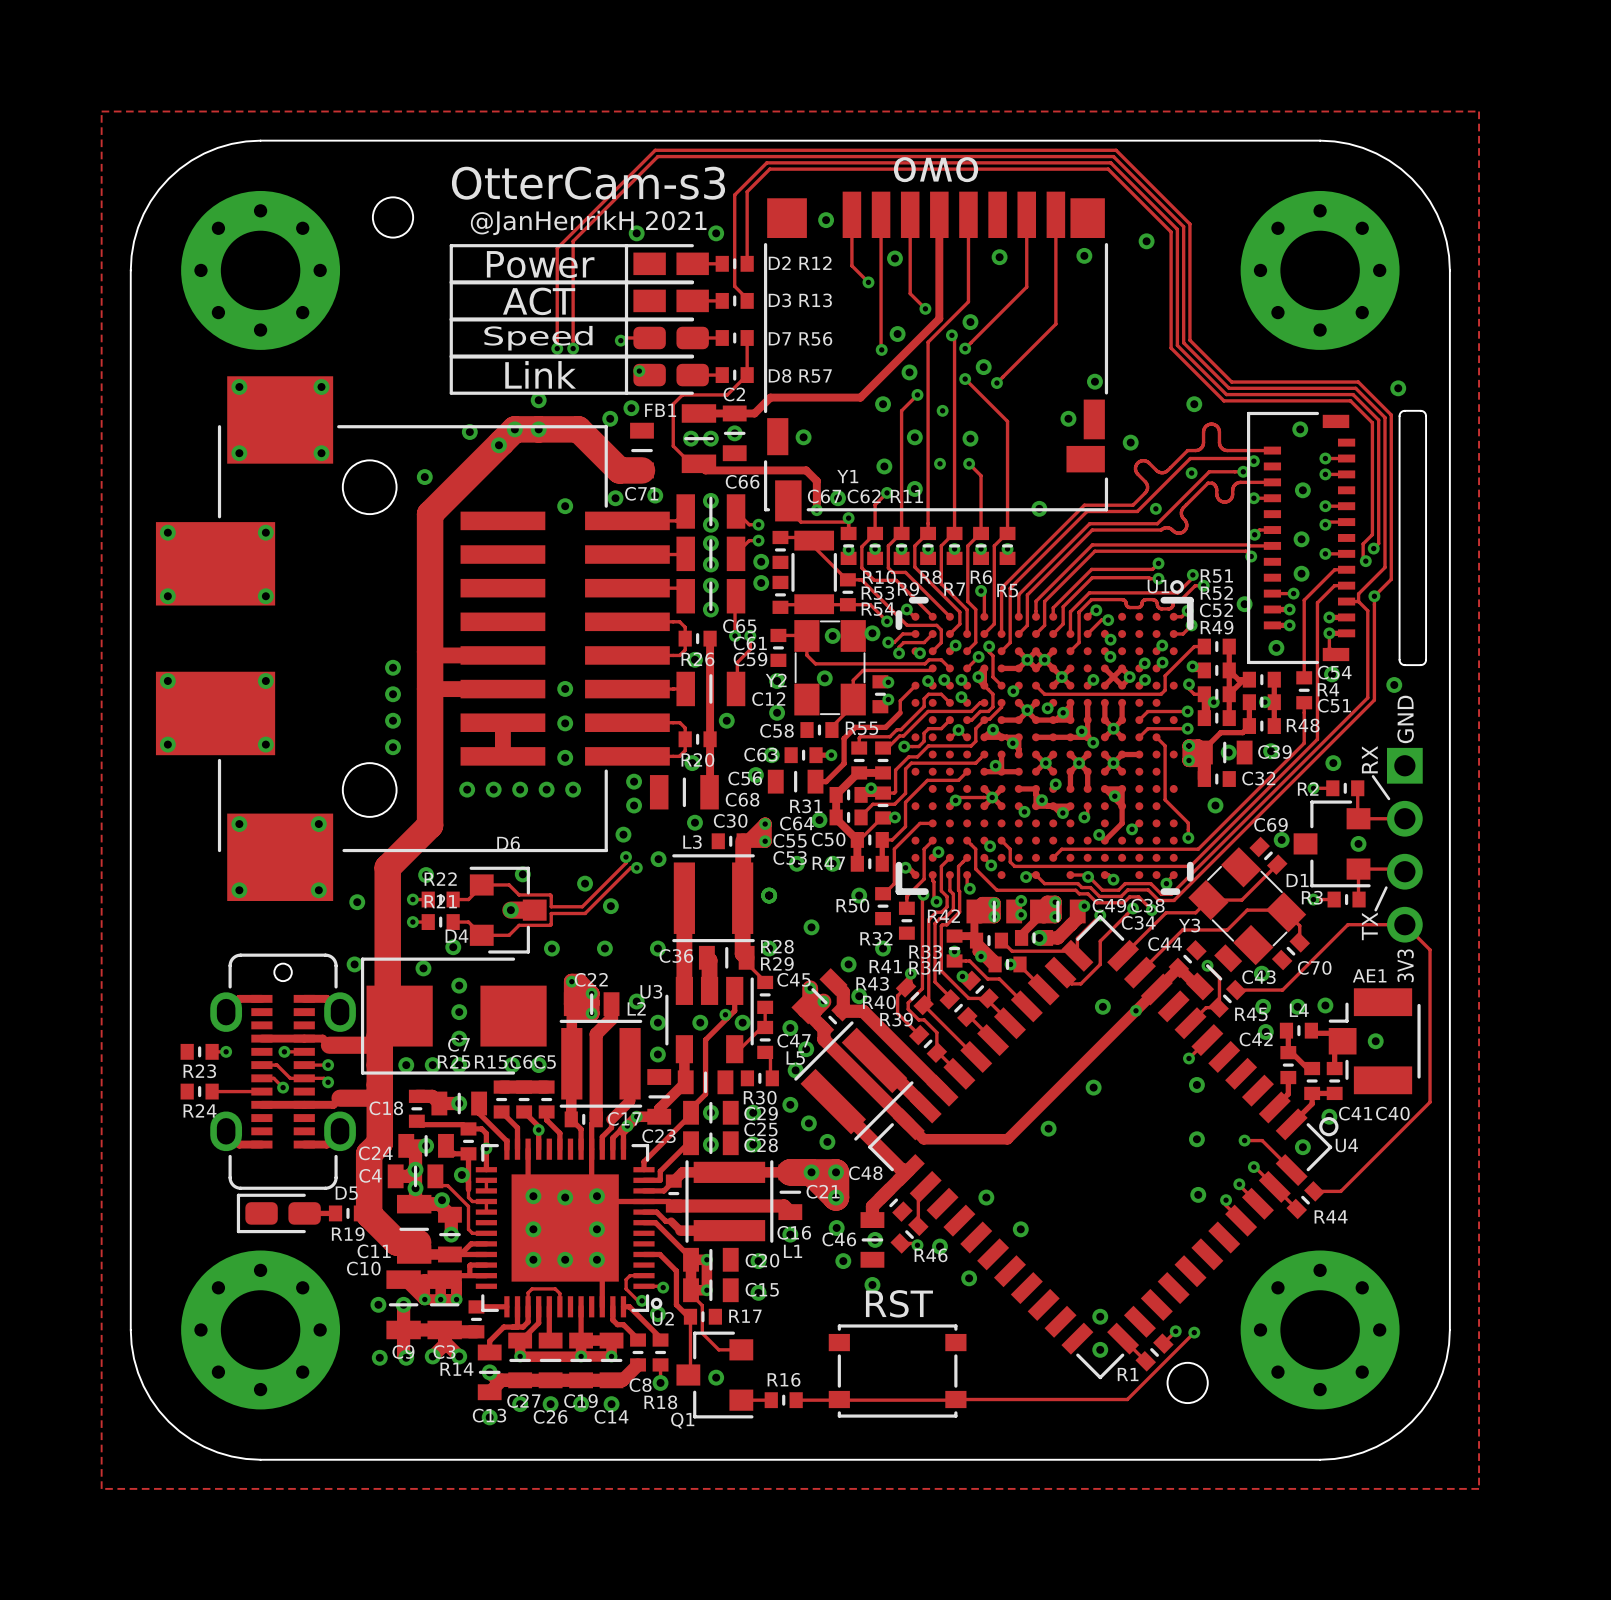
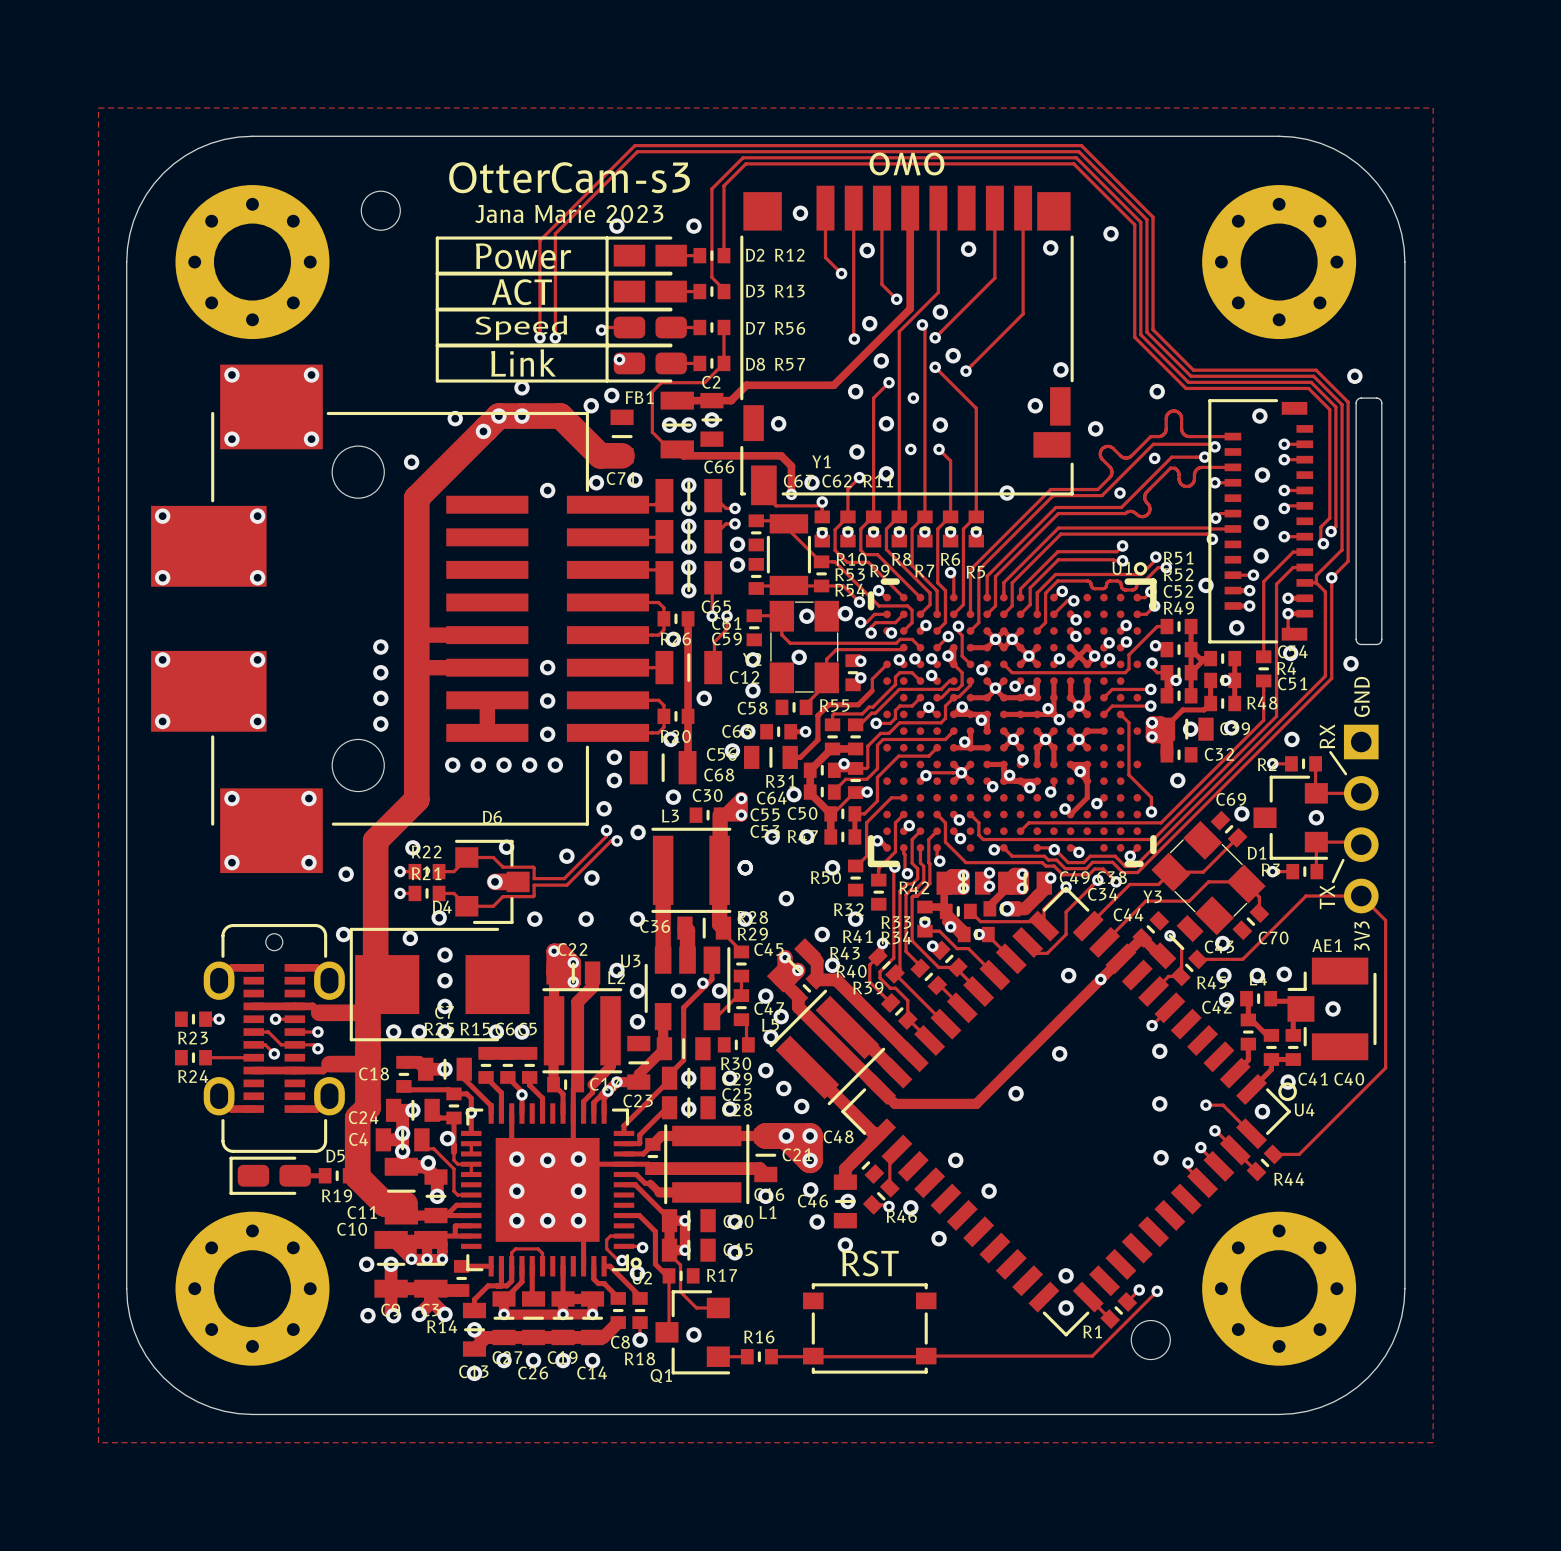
text: @JanHenrikH 2021 (588, 222) -> Jana Marie 2023 (569, 213)

